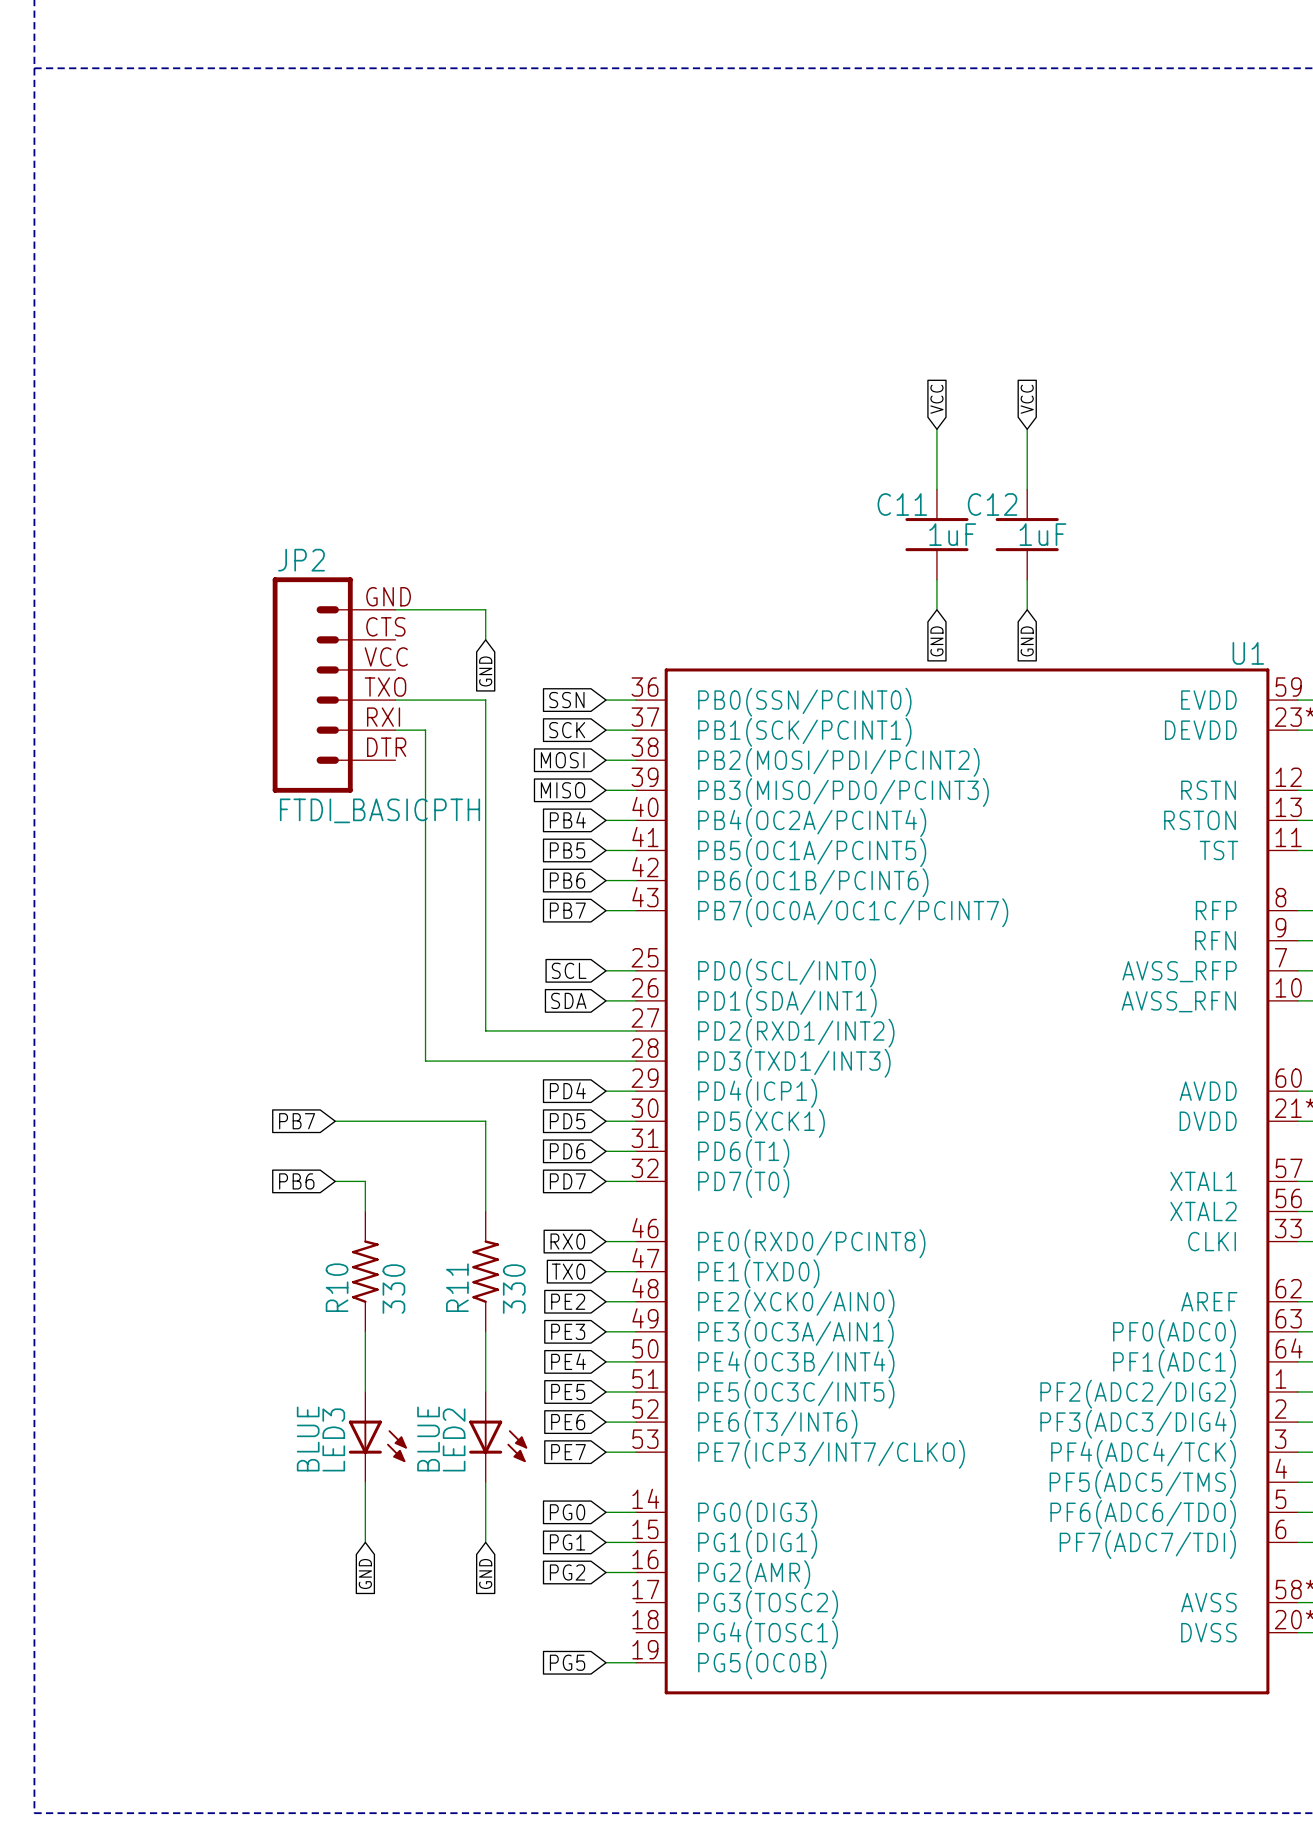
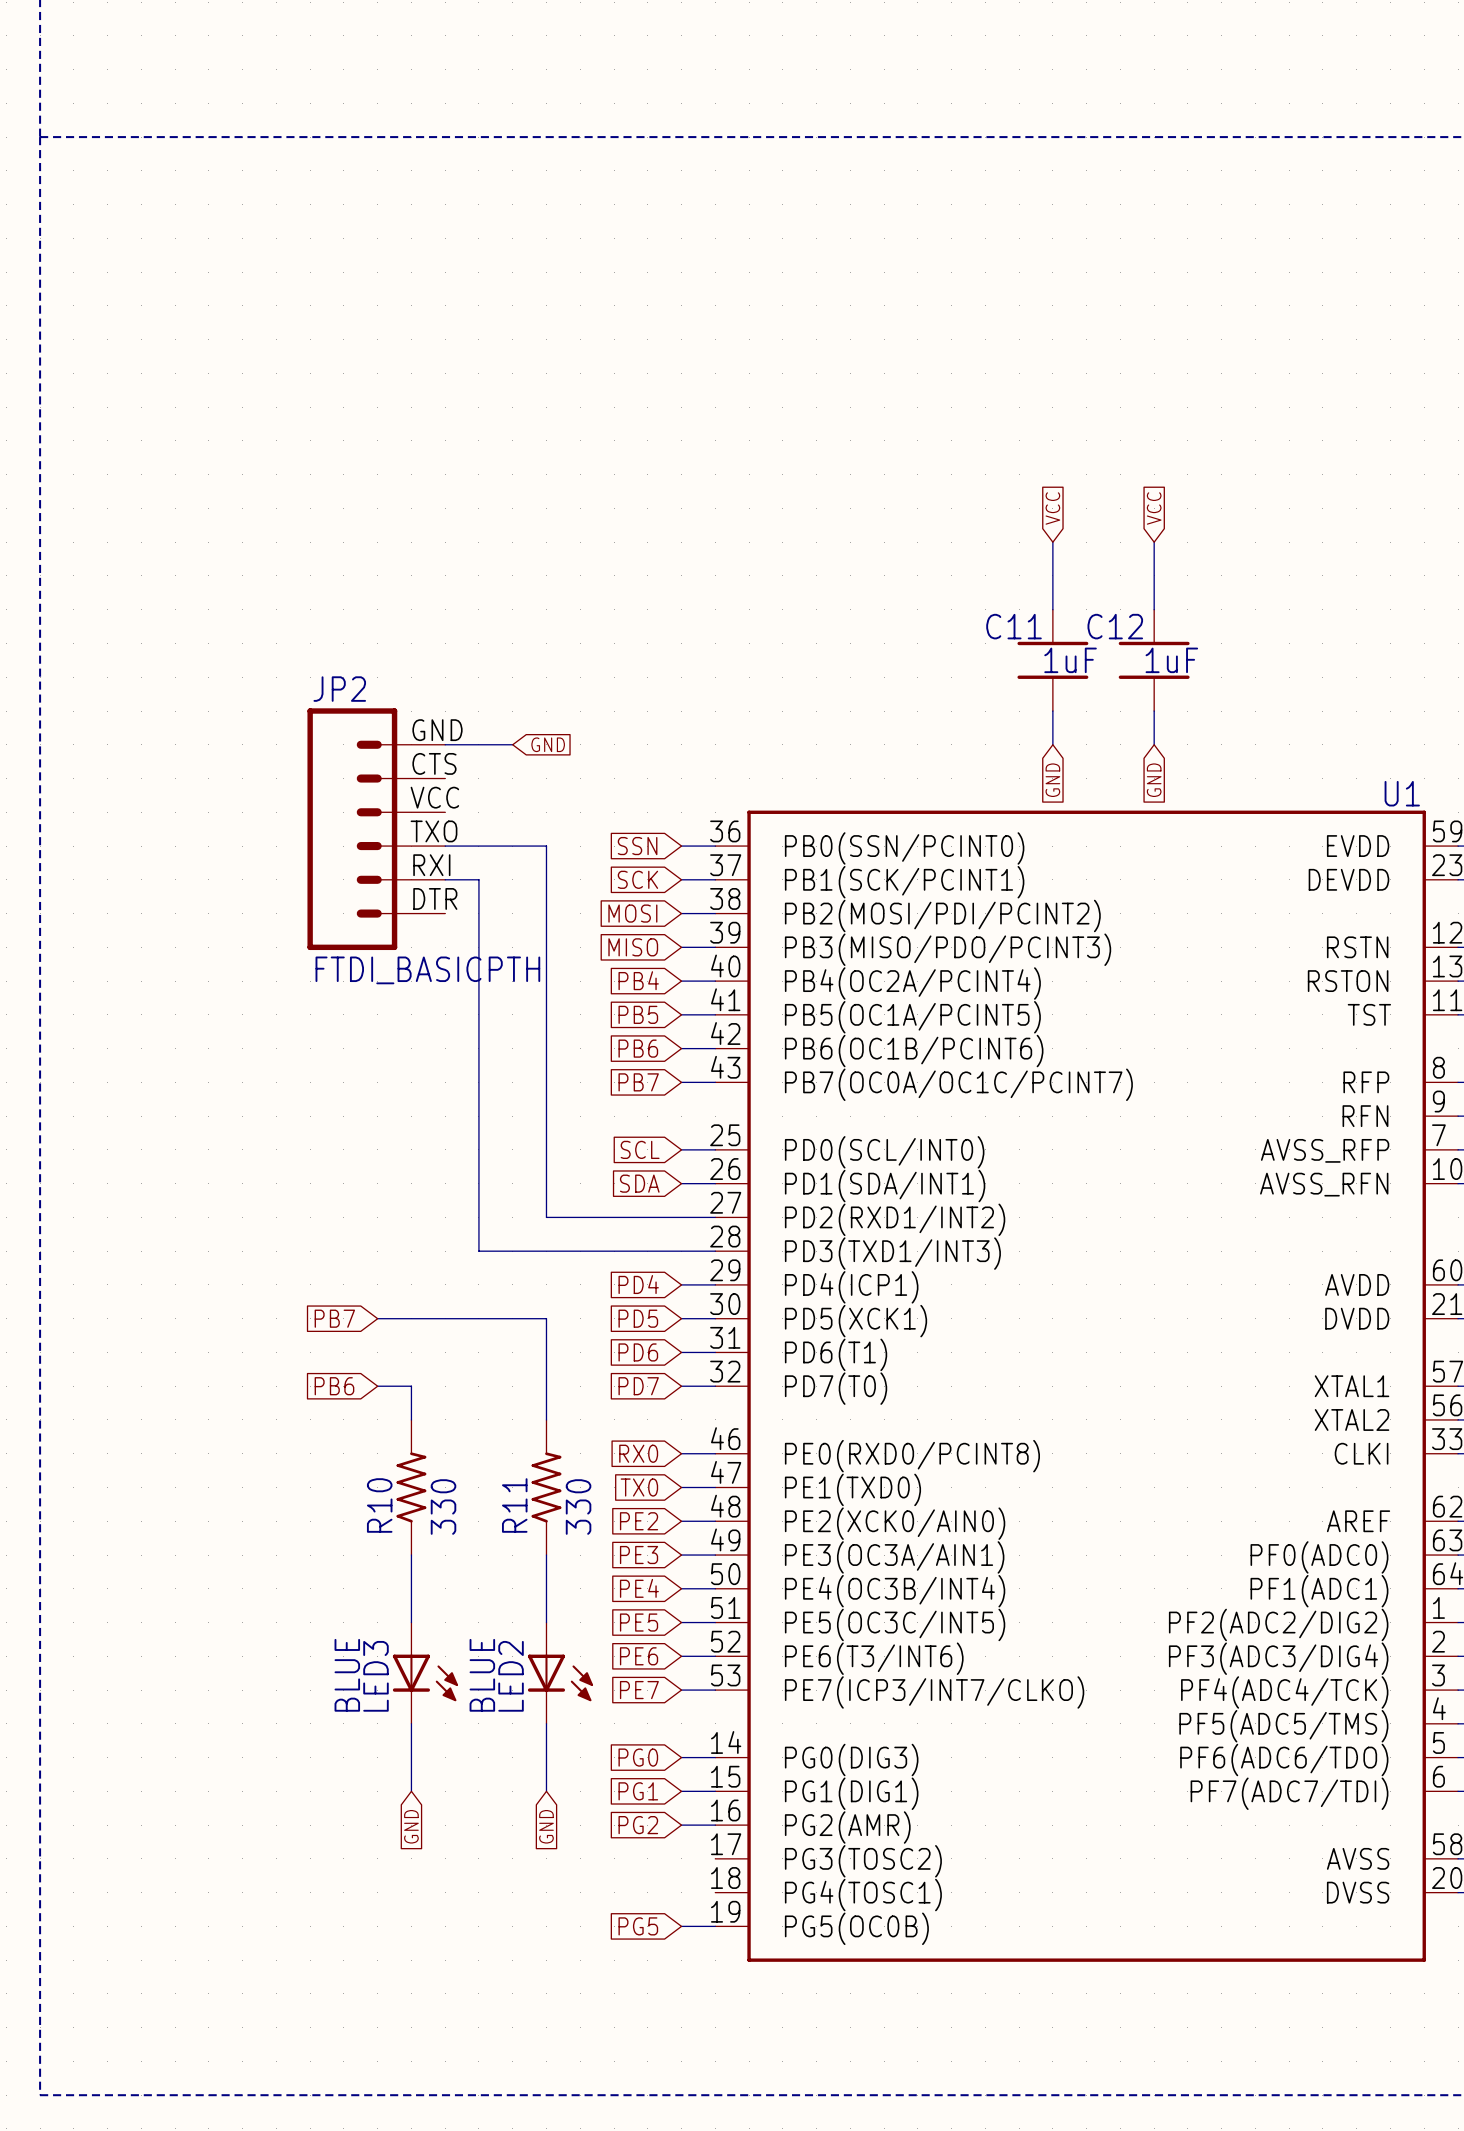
wire: (455, 609) (485, 609) (485, 639) -> none
global label rotation: 0° (485, 671) -> 90° counterclockwise (548, 744)

